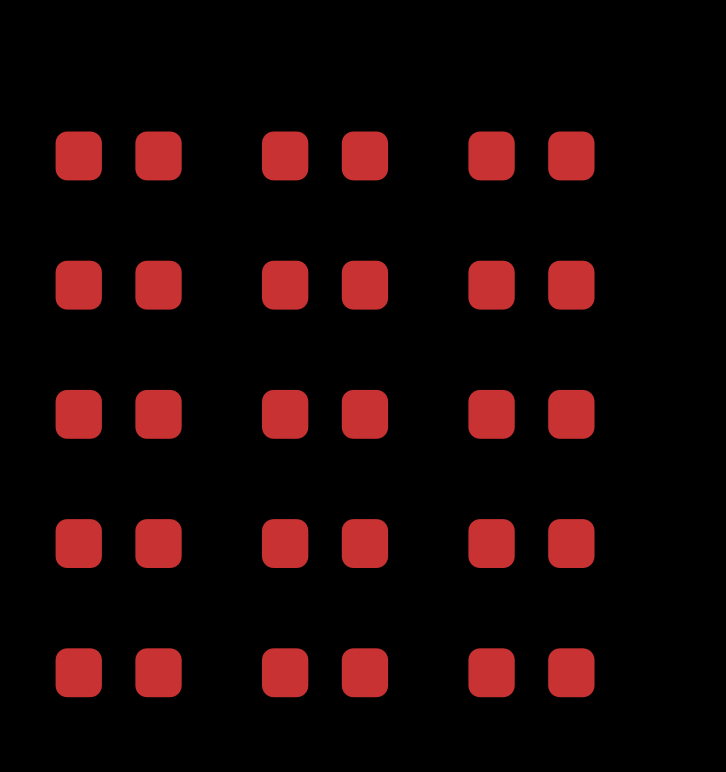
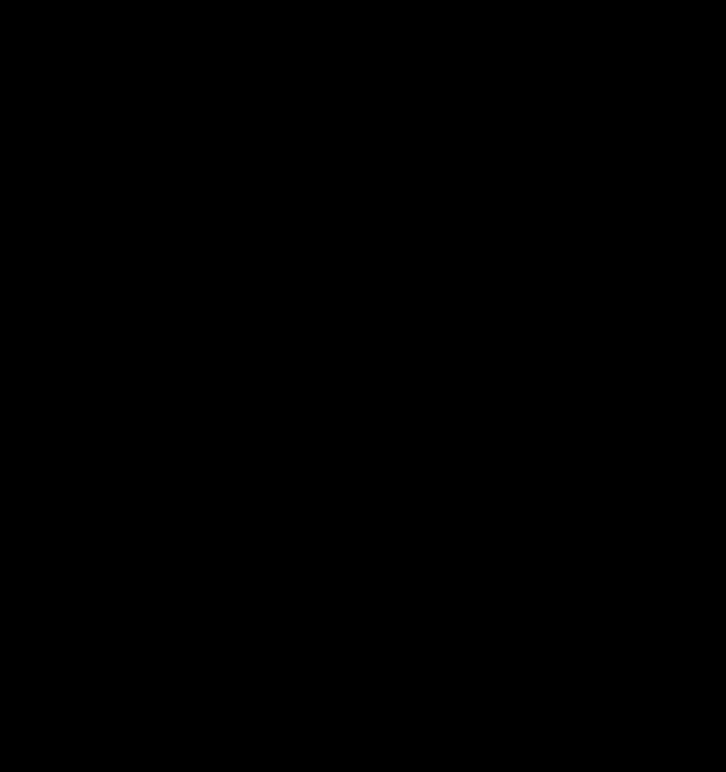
part: (118, 155) -> none
part: (325, 155) -> none
part: (531, 155) -> none
part: (118, 285) -> none
part: (325, 285) -> none
part: (531, 285) -> none
part: (118, 414) -> none
part: (325, 414) -> none
part: (531, 414) -> none
part: (118, 543) -> none
part: (325, 543) -> none
part: (531, 543) -> none
part: (118, 672) -> none
part: (325, 672) -> none
part: (531, 672) -> none

